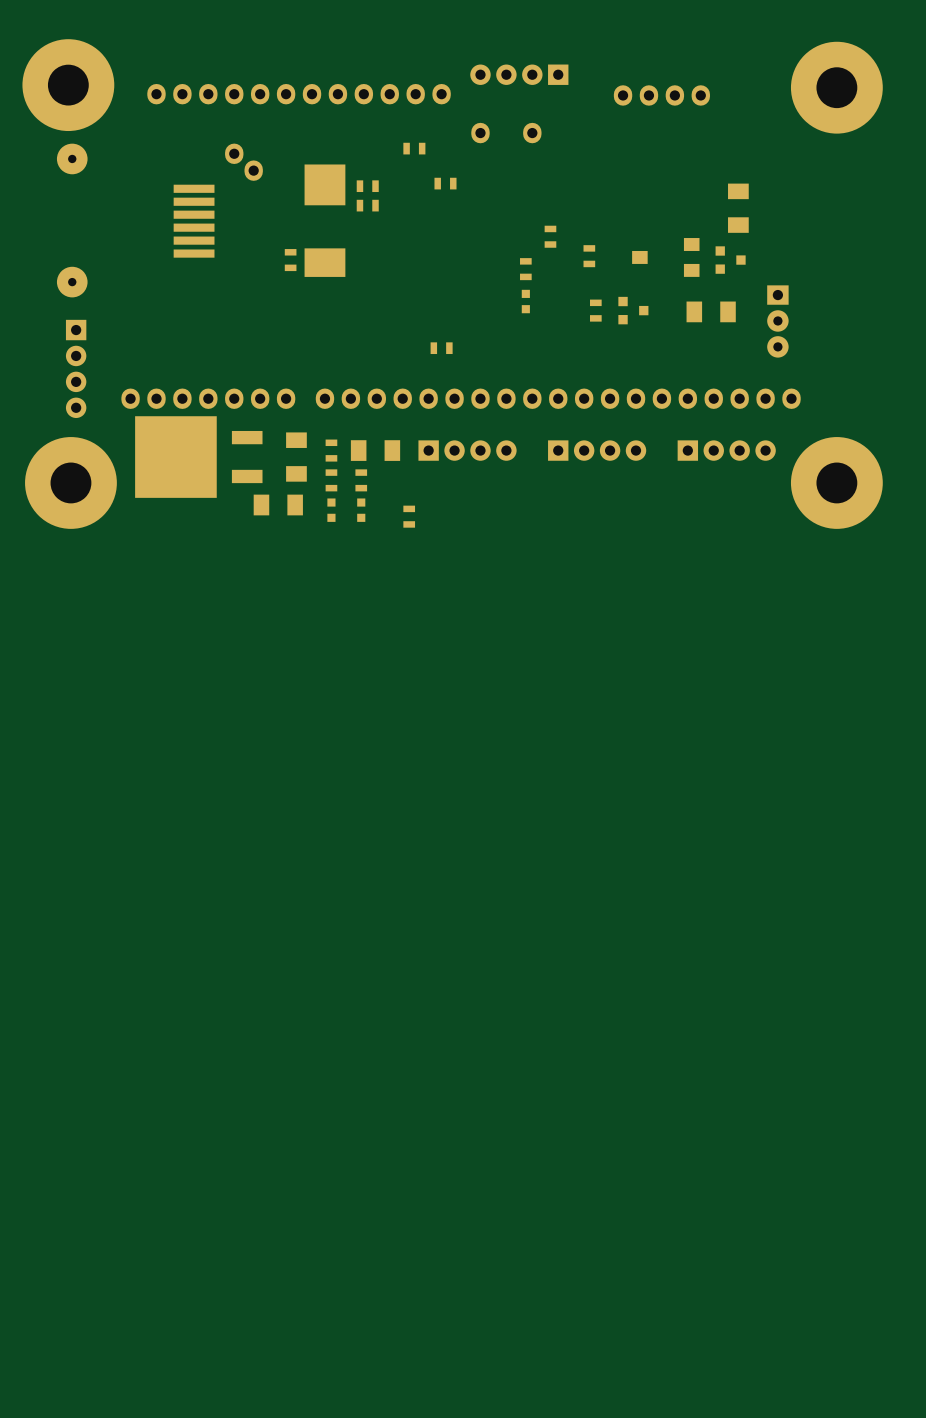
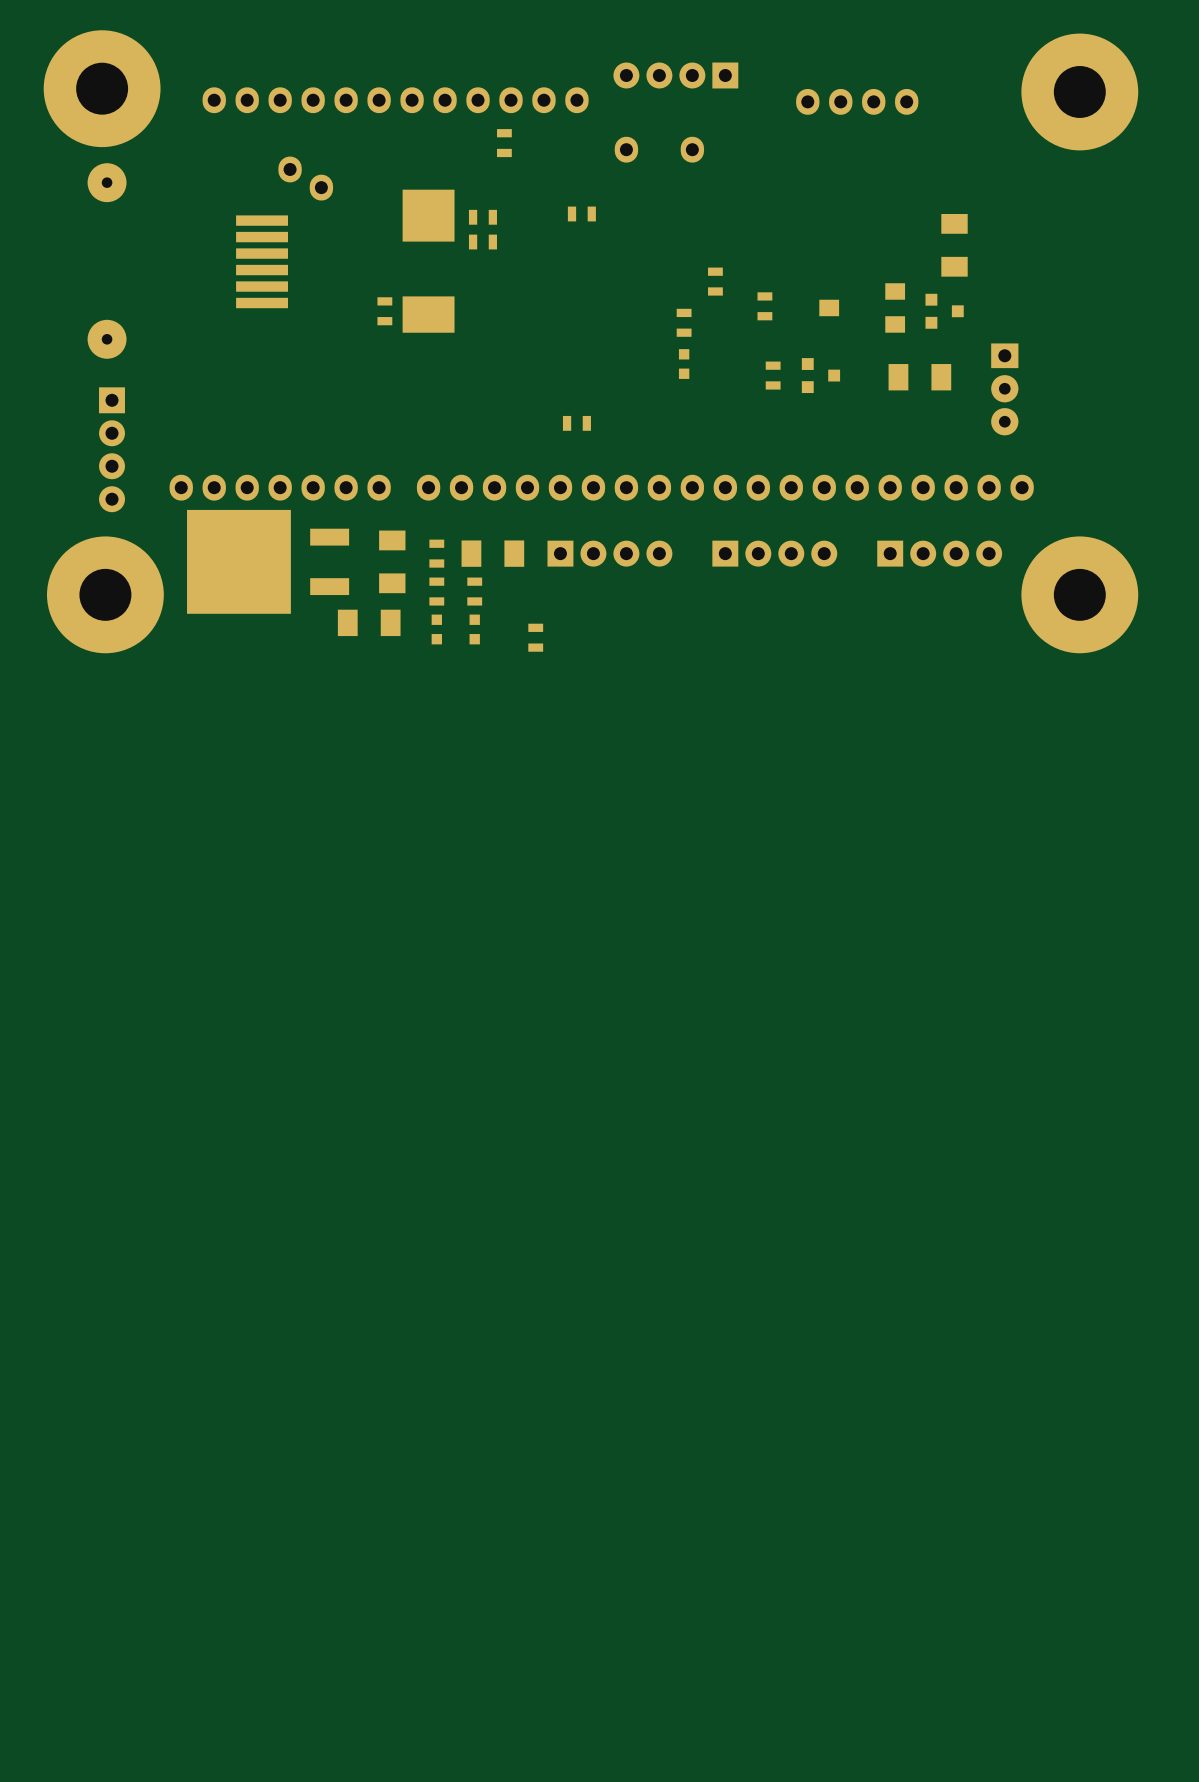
part: none -> (290, 169)
part rotation: 0° (414, 148) -> 90° clockwise (504, 143)
part position: (414, 148) -> (504, 143)
part: (234, 153) -> none
part: none -> (321, 187)
part: (253, 170) -> none

